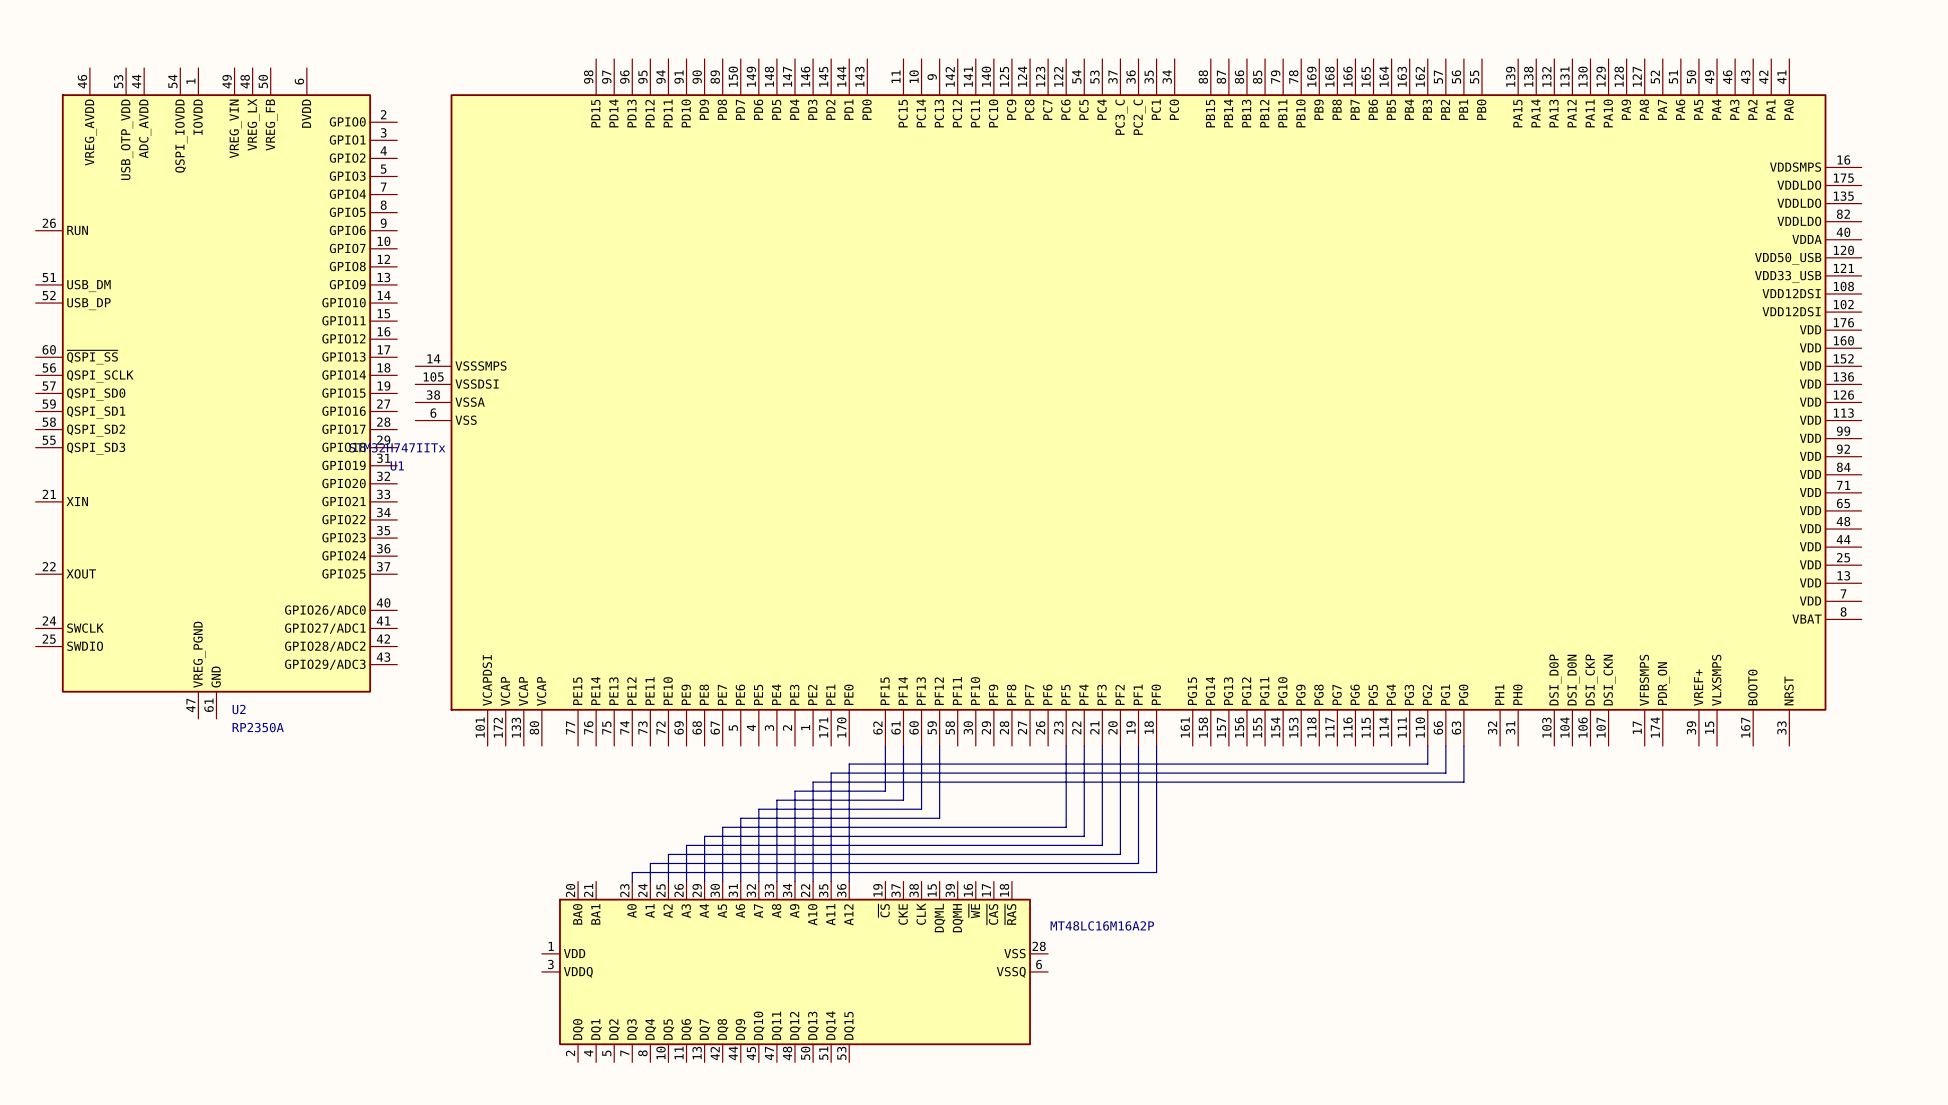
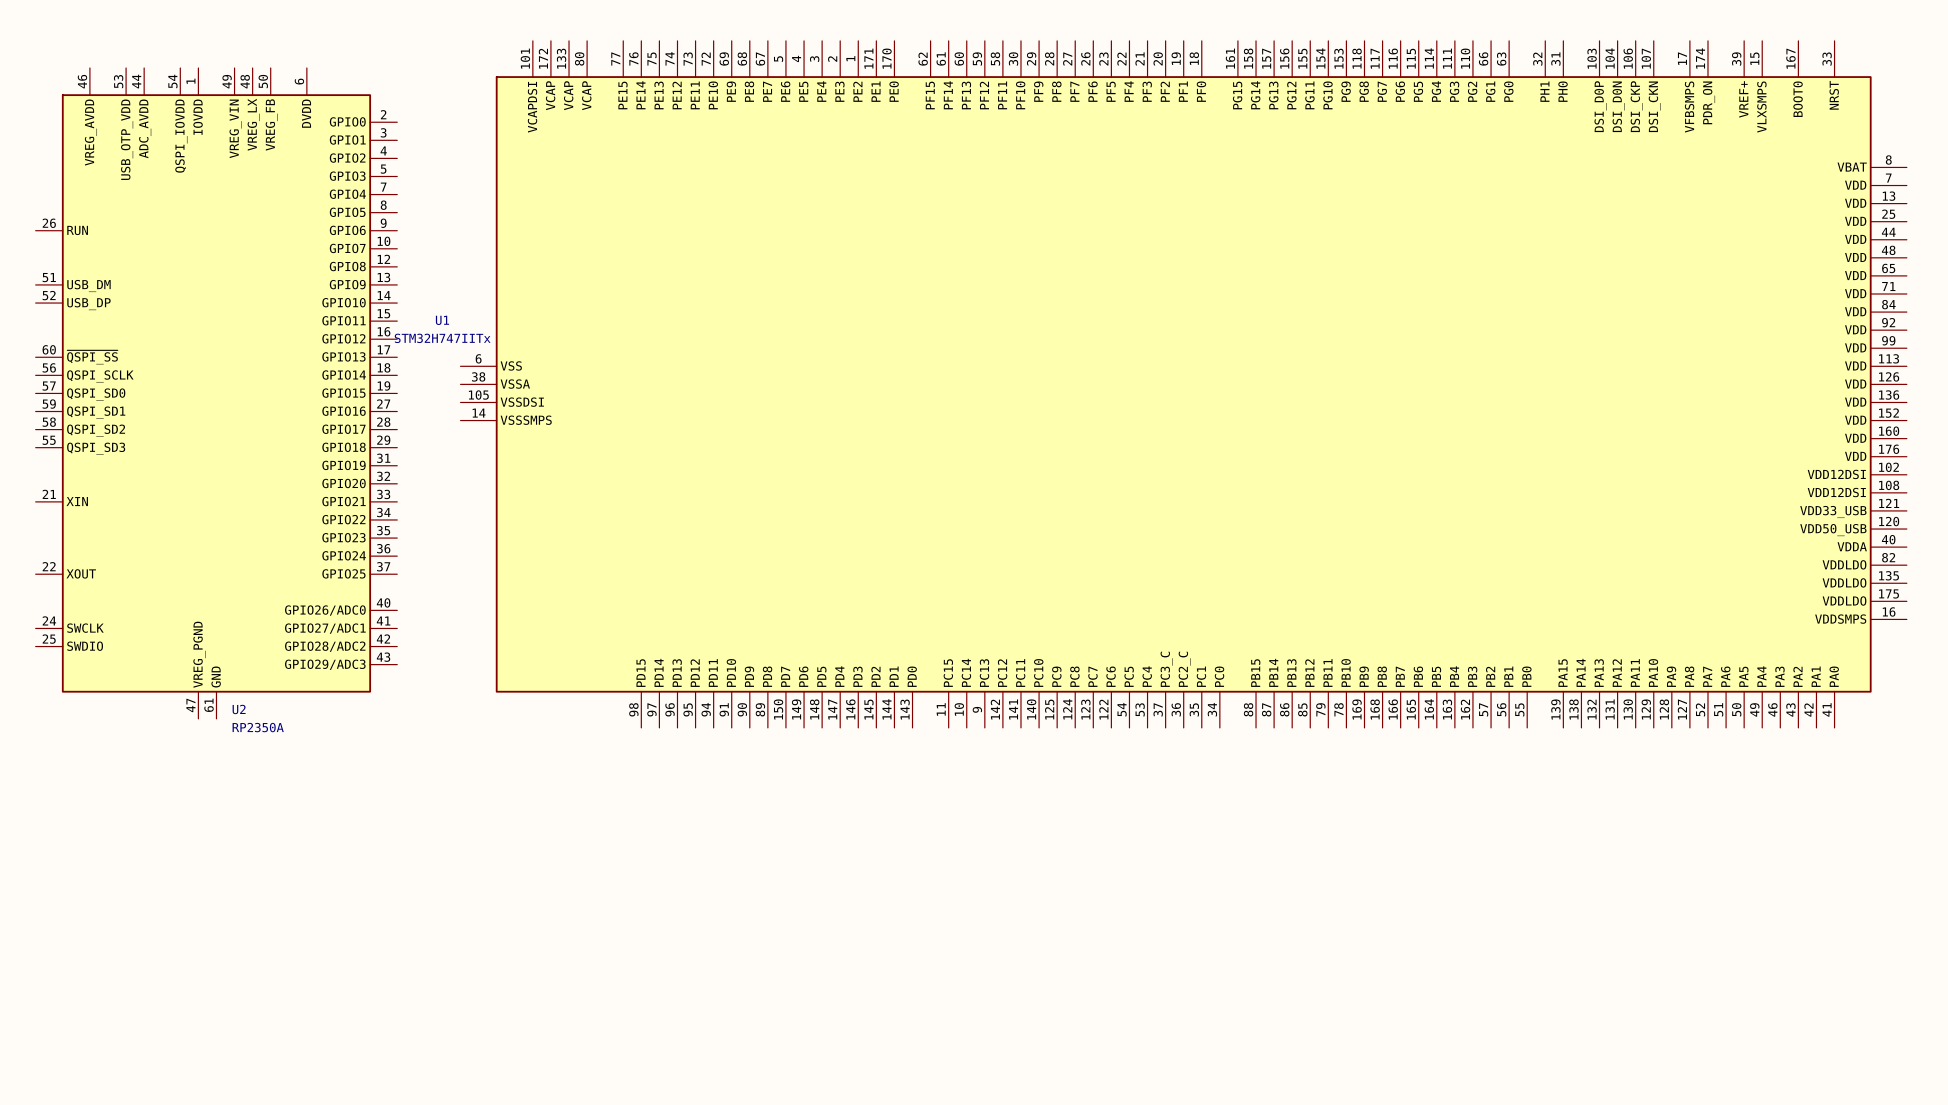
U1 flip: as is (1138, 402) -> up-down (1183, 384)
wire: (885, 745) (885, 791) (795, 791) (795, 881) -> none
wire: (903, 745) (903, 800) (776, 800) (776, 881) -> none
wire: (921, 745) (921, 809) (758, 809) (758, 881) -> none
wire: (939, 745) (939, 818) (740, 818) (740, 881) -> none
wire: (1066, 745) (1066, 827) (722, 827) (722, 881) -> none
wire: (1084, 745) (1084, 836) (704, 836) (704, 881) -> none
wire: (1102, 745) (1102, 845) (686, 845) (686, 881) -> none
wire: (1120, 745) (1120, 854) (668, 854) (668, 881) -> none
wire: (1138, 745) (1138, 863) (650, 863) (650, 881) -> none
wire: (1156, 745) (1156, 872) (632, 872) (632, 881) -> none
wire: (1427, 745) (1427, 764) (849, 764) (849, 881) -> none
wire: (1445, 745) (1445, 773) (831, 773) (831, 881) -> none
wire: (1463, 745) (1463, 782) (813, 782) (813, 881) -> none
part: MT48LC16M16A2P (795, 971) -> none

